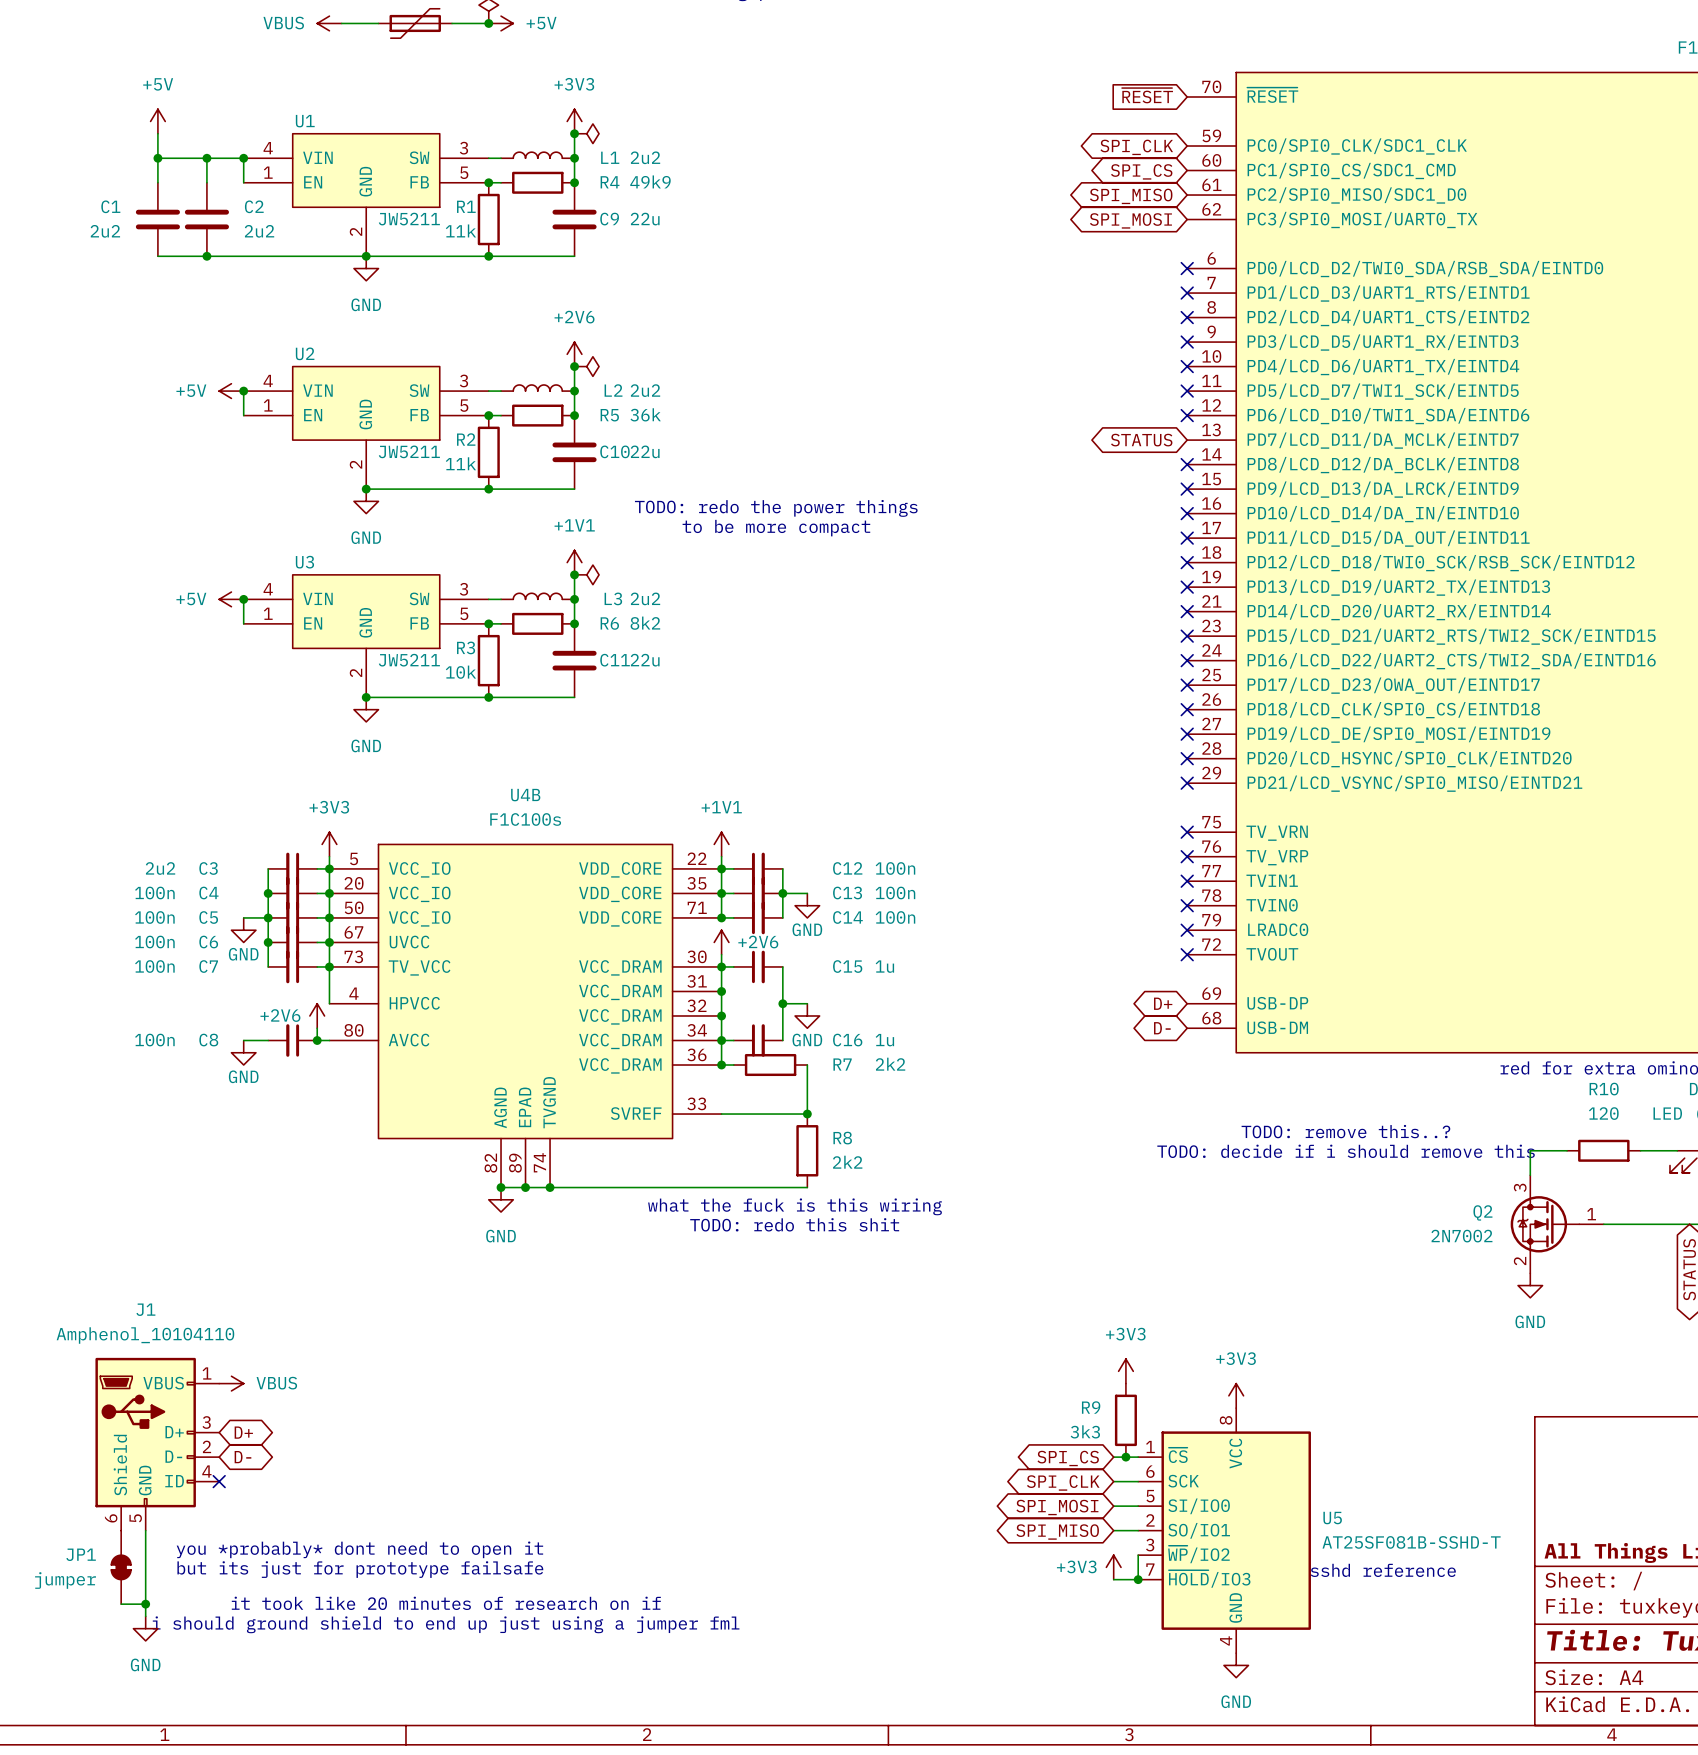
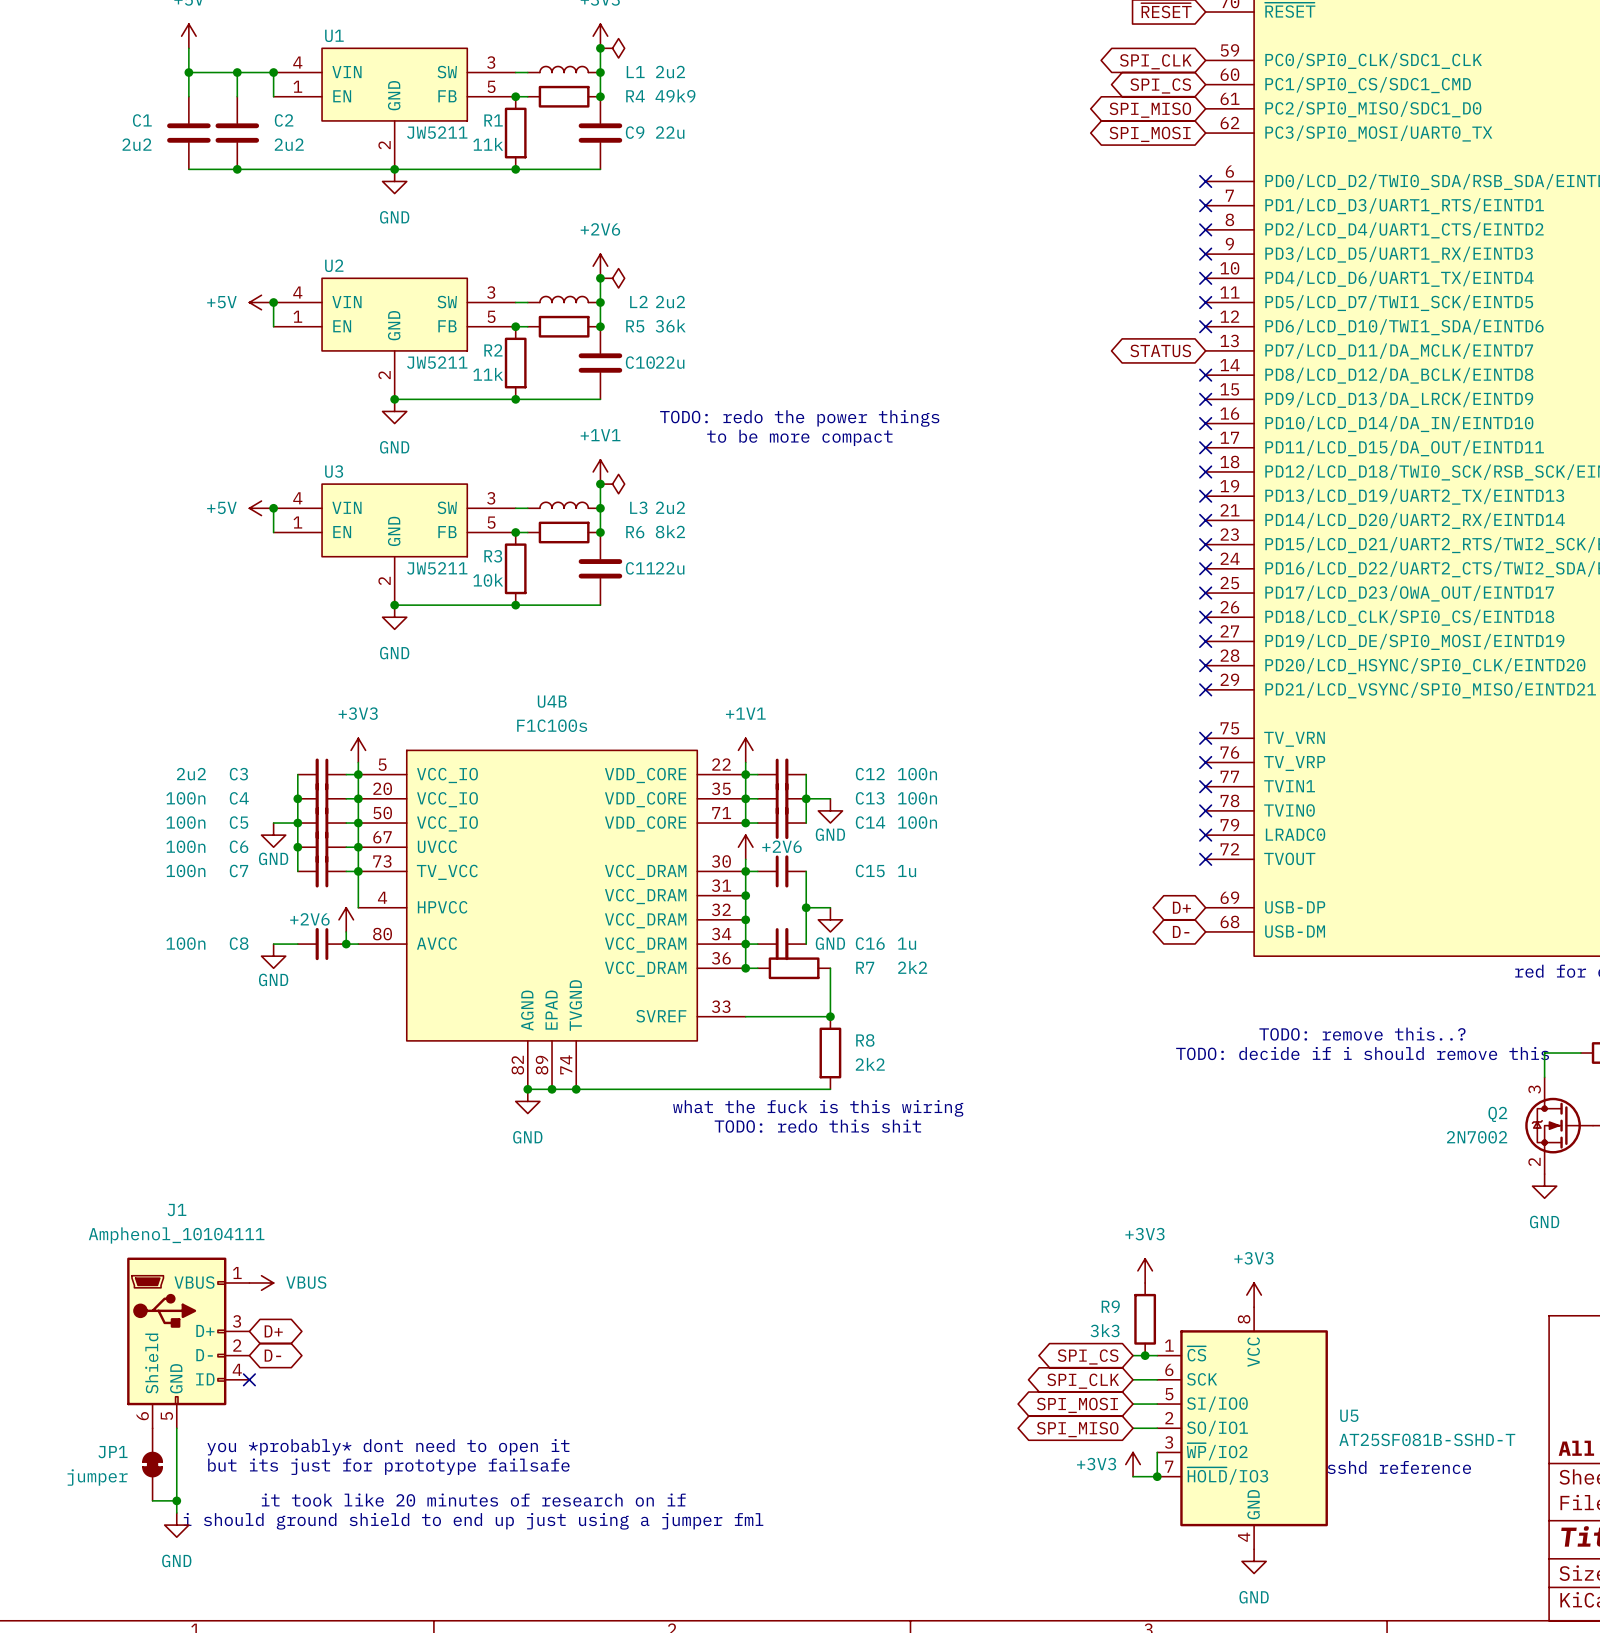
J1 value: Amphenol_10104110 (145, 1335) -> Amphenol_10104111 (176, 1235)

